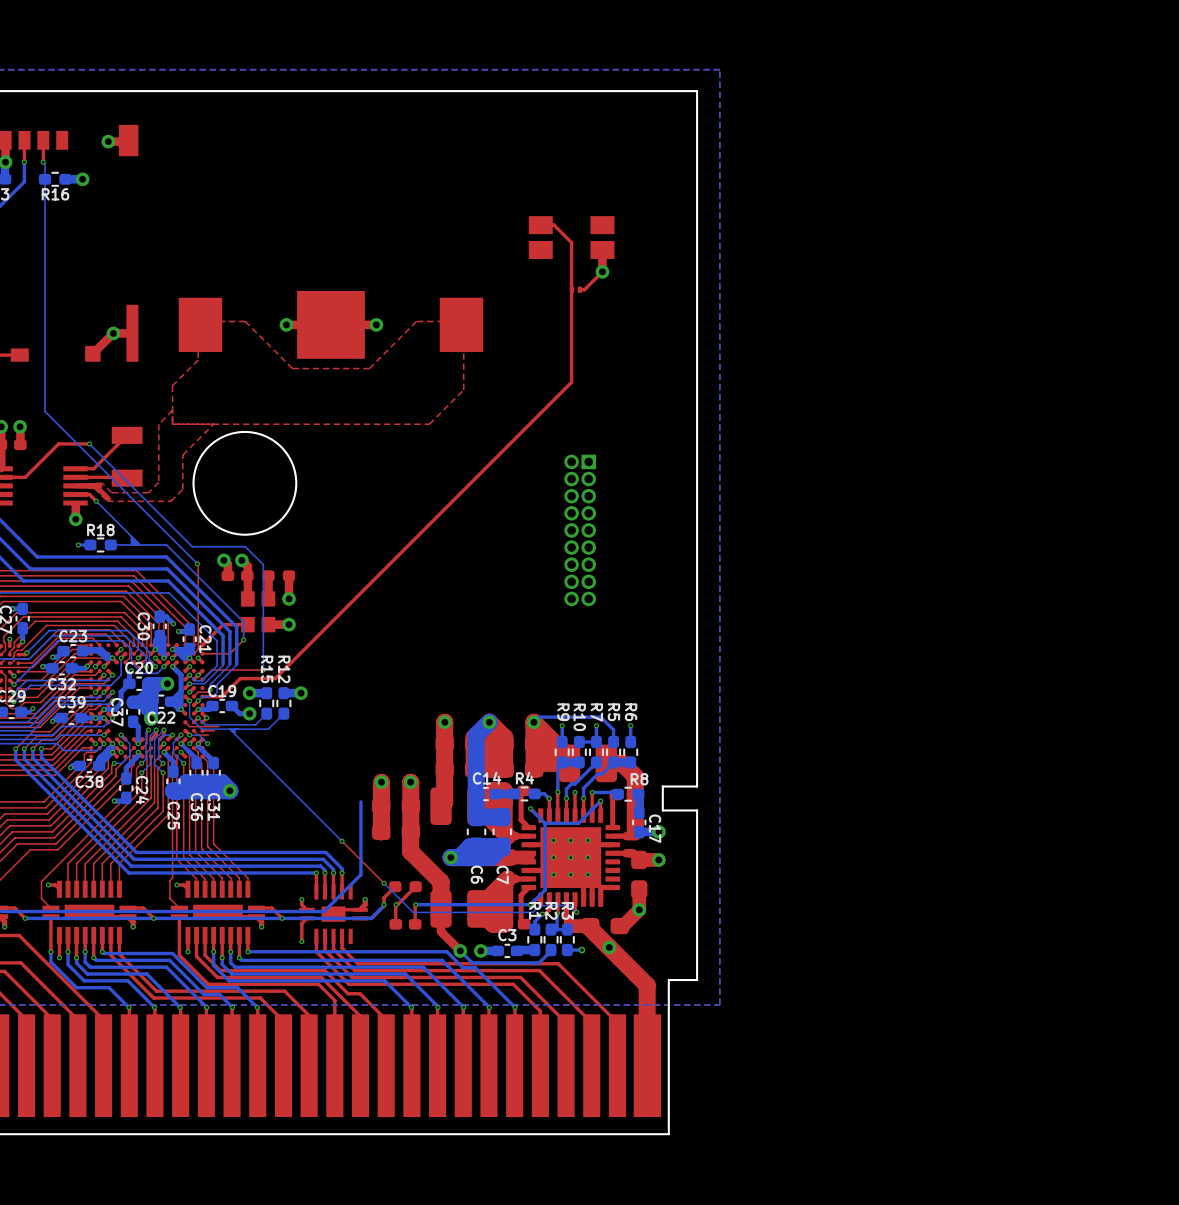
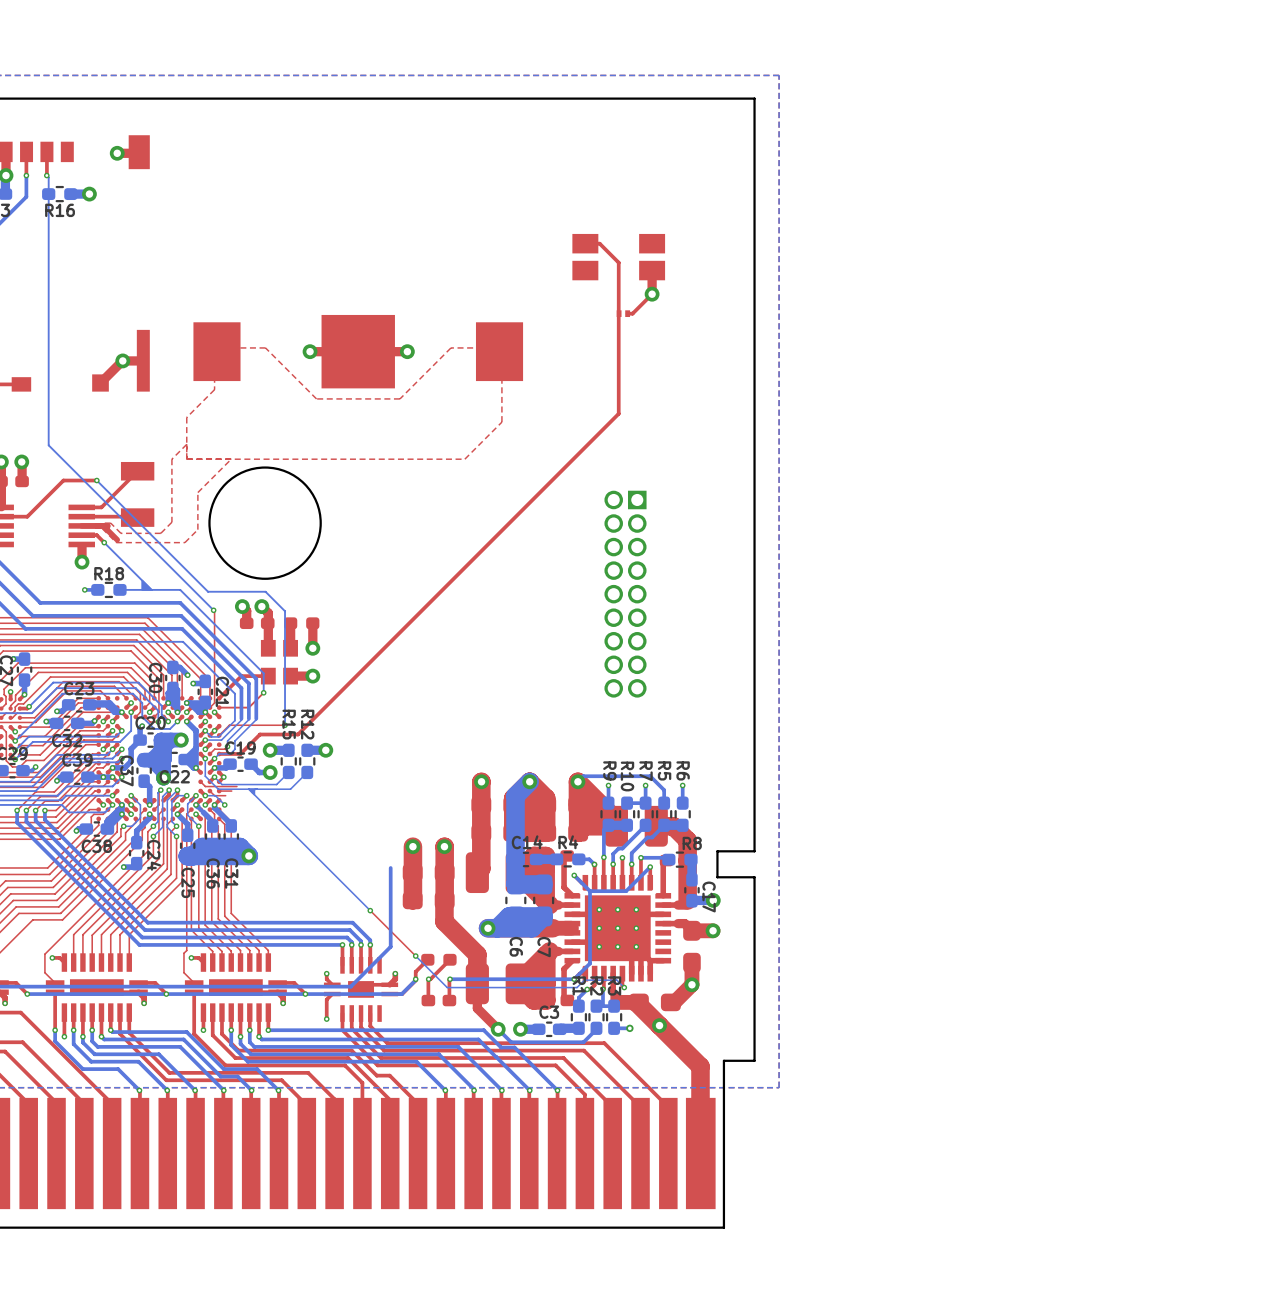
part: (580, 530) -> none
part: none -> (625, 594)

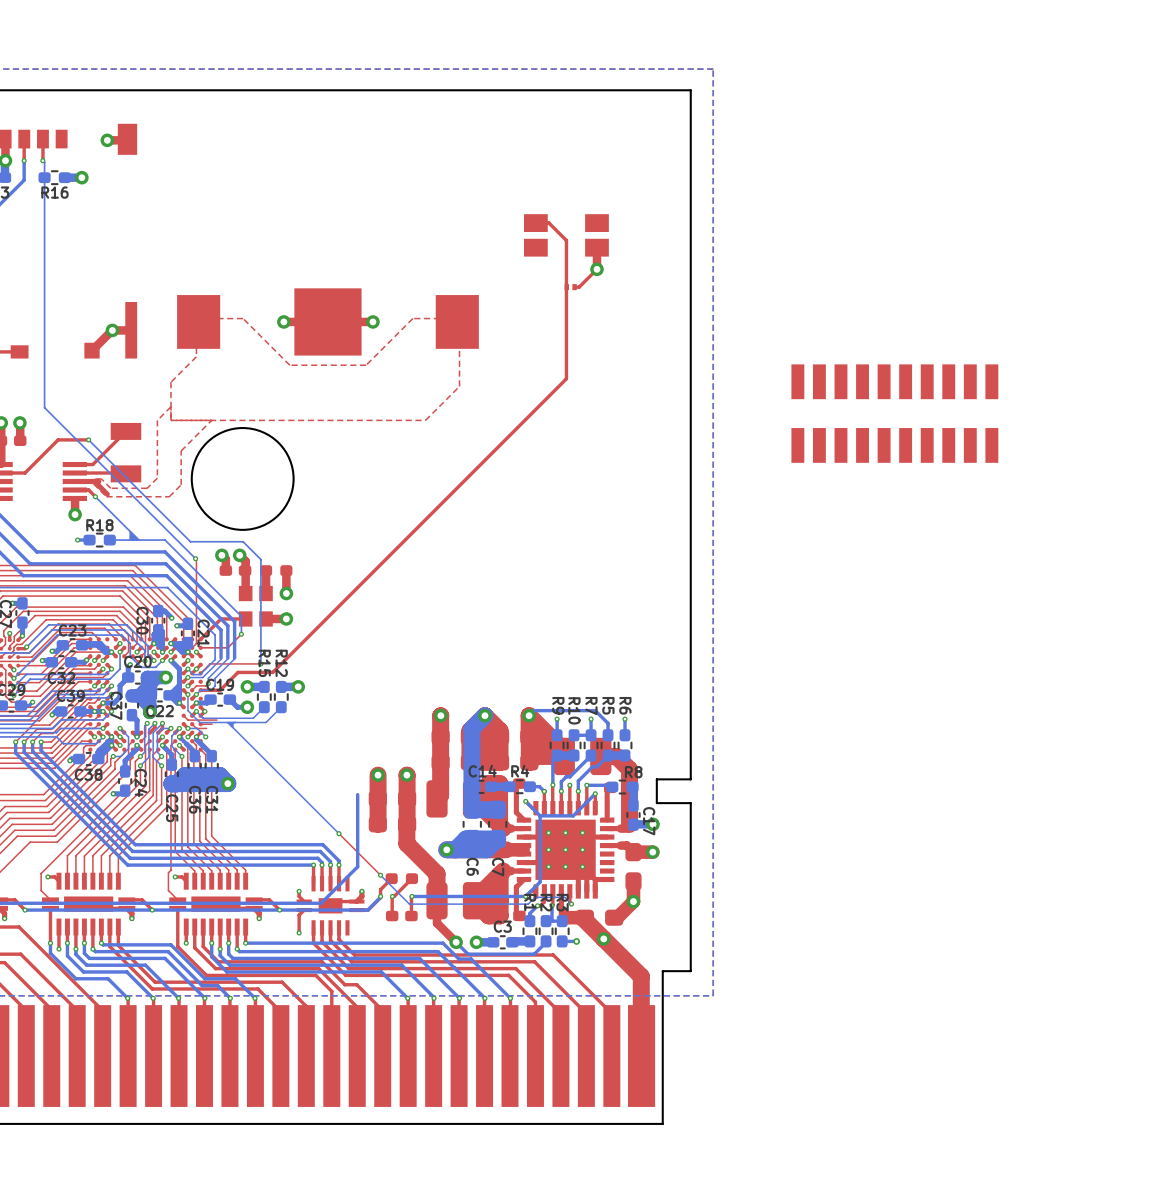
part: none -> (894, 413)
part: (625, 594) -> none

